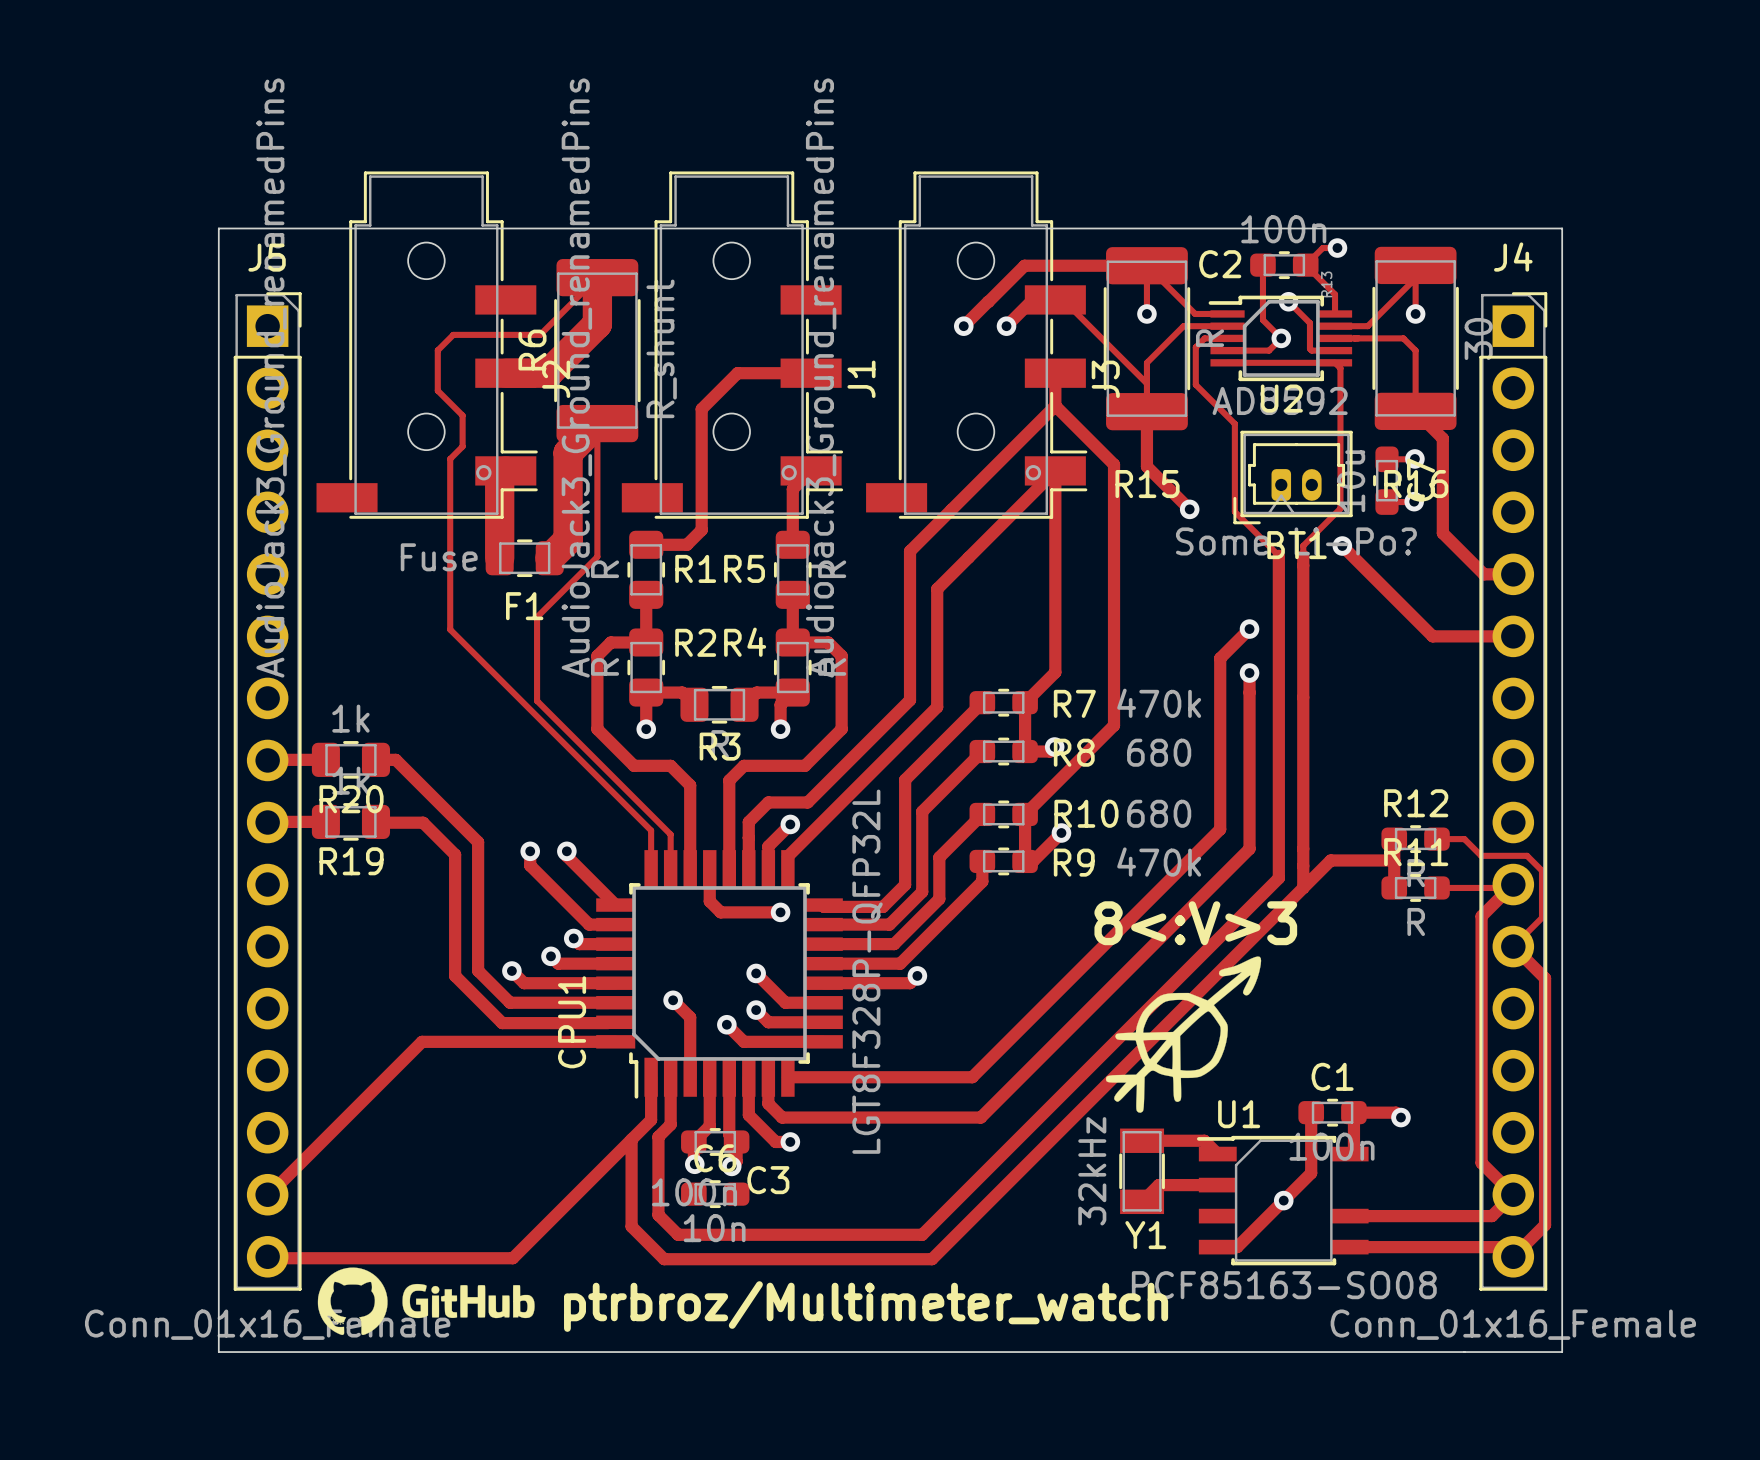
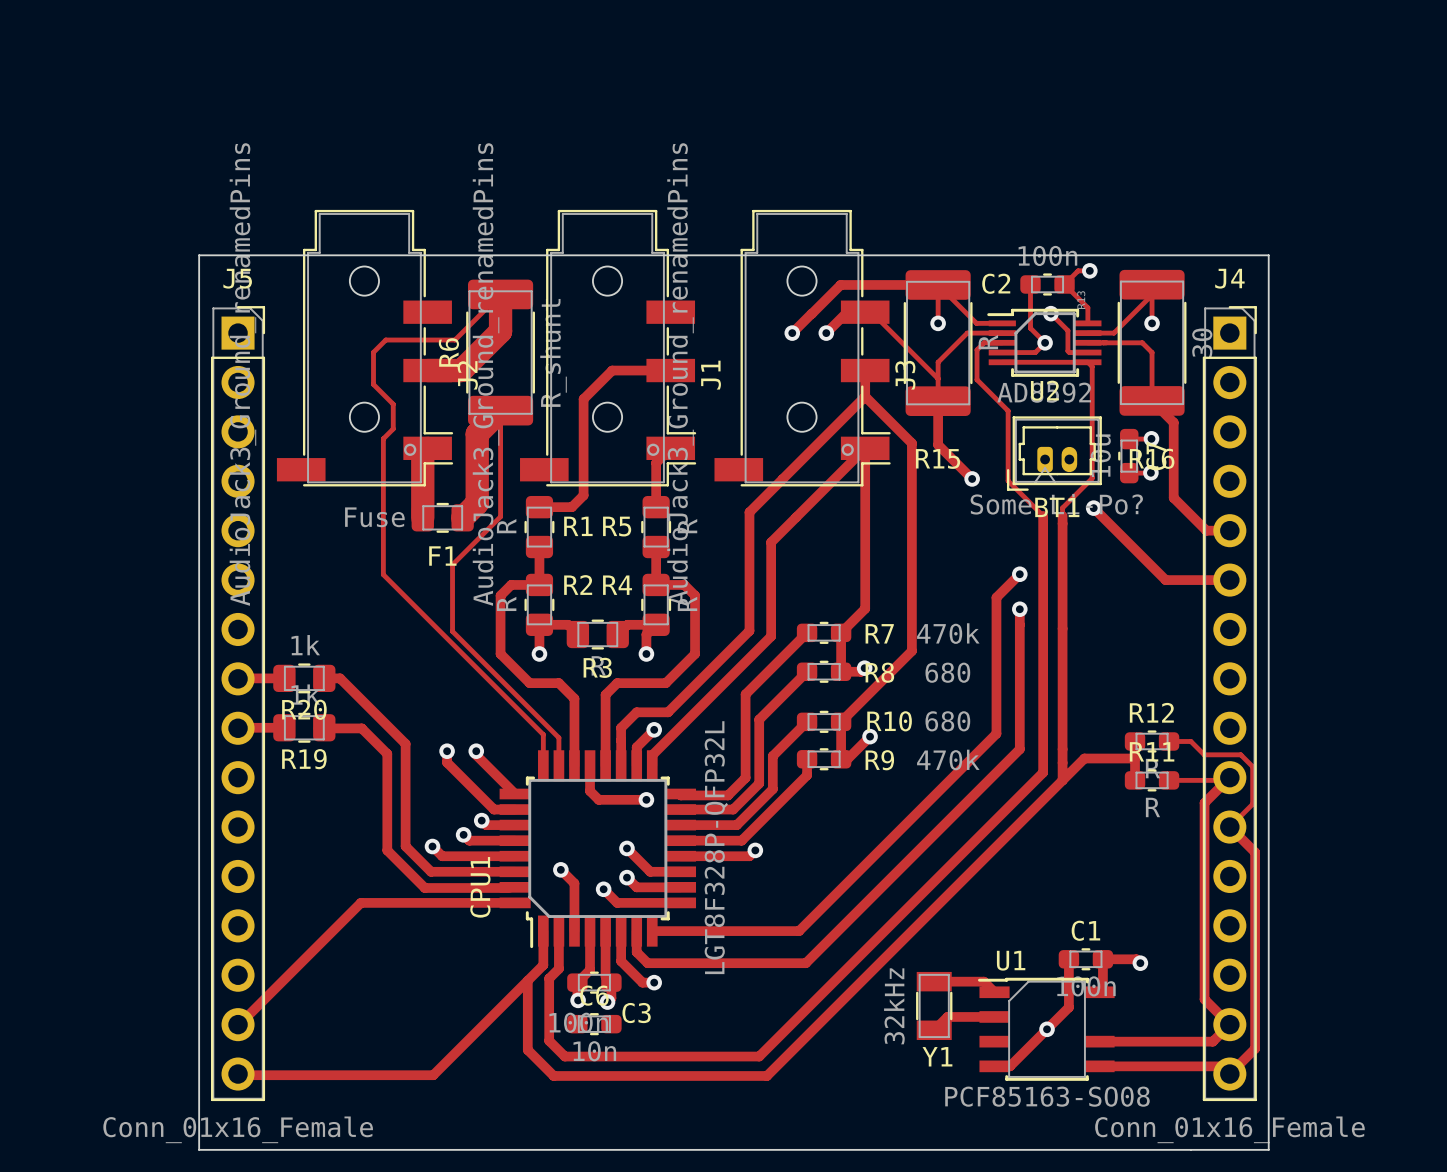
text: 8<:V>3 (1195, 923) -> none
drawing: [1105, 956, 1262, 1113] -> none
drawing: [317, 1267, 535, 1336] -> none
text: ptrbroz/Multimeter_watch (866, 1306) -> none

